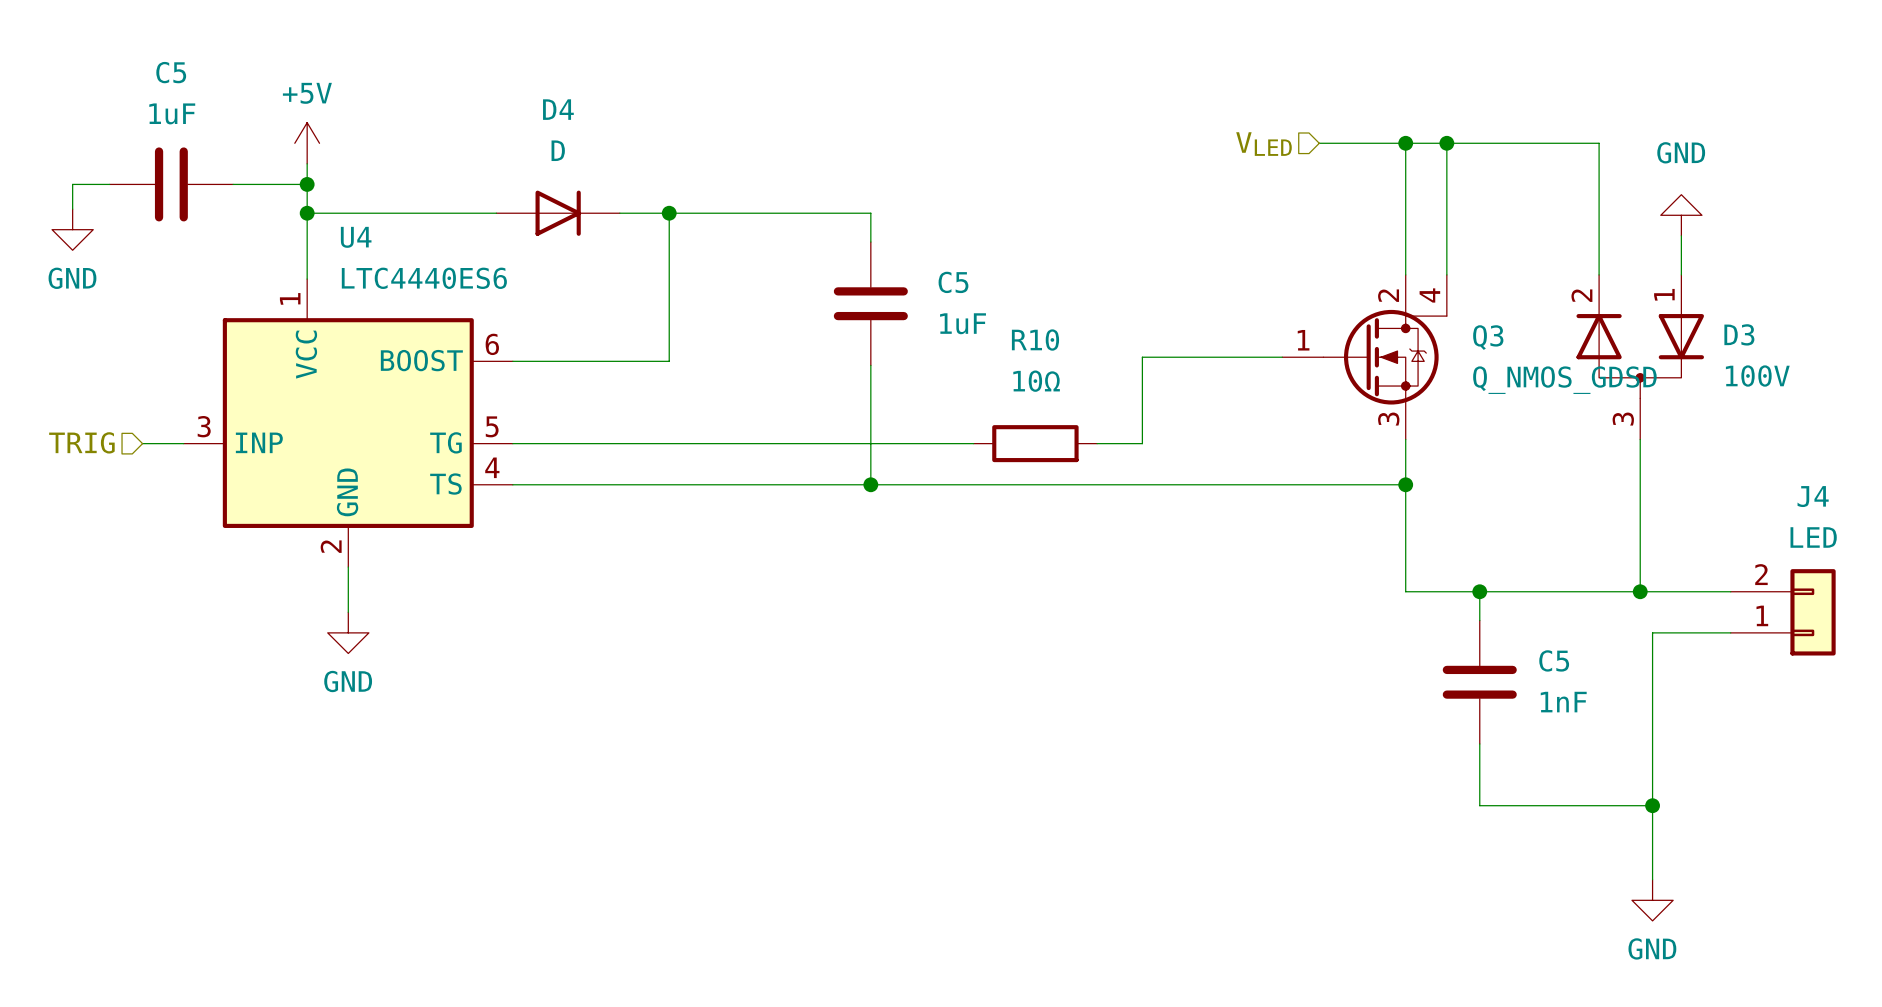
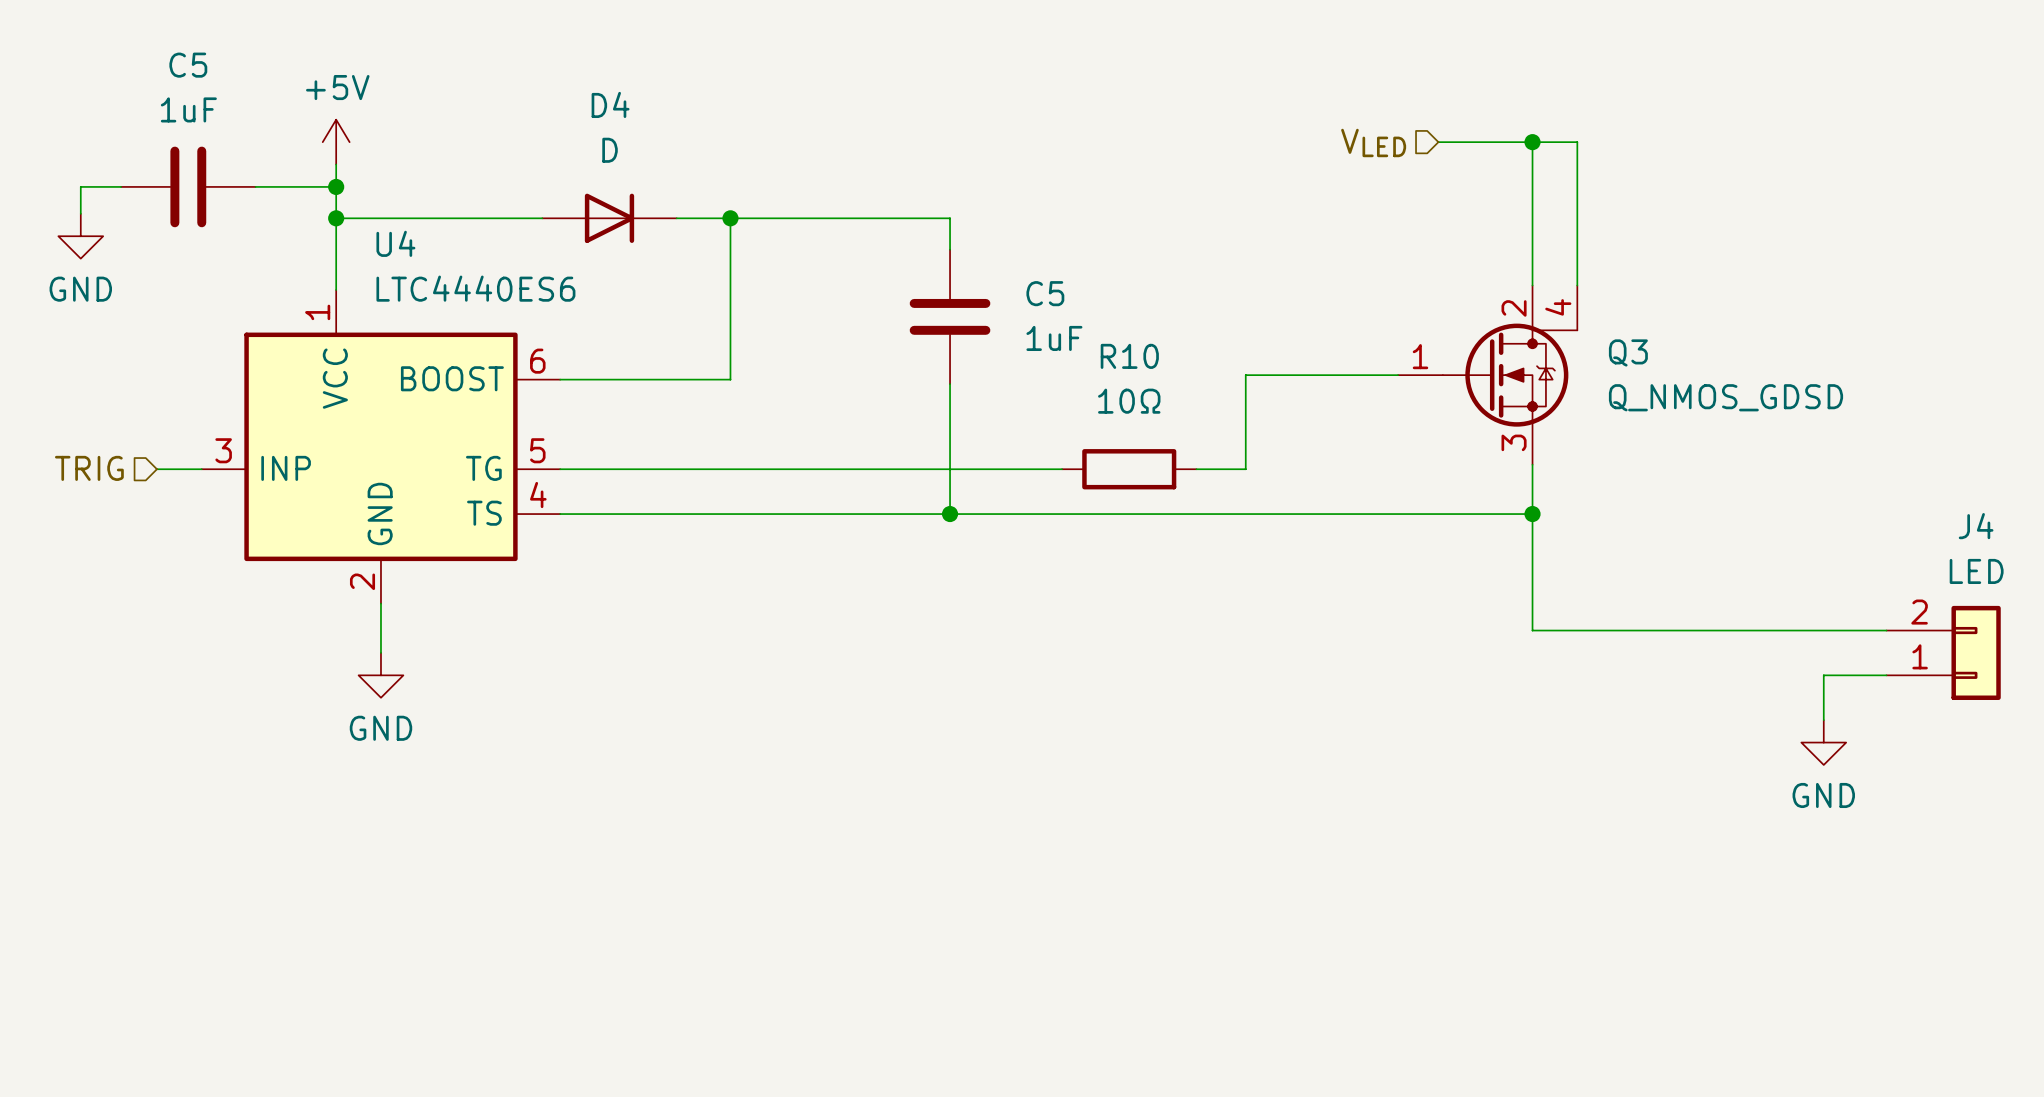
wire: (1446, 143) (1599, 143) (1599, 274) -> none
junction: (1446, 143) -> none
power symbol: GND (1681, 215) -> none
wire: (1681, 235) (1681, 274) -> none
D3: 100V (1640, 357) -> none
wire: (1640, 439) (1640, 591) -> none
wire: (1479, 591) (1479, 620) -> none
junction: (1479, 591) -> none
junction: (1640, 591) -> none
wire: (1673, 632) (1652, 632) (1652, 879) -> (1823, 675) (1823, 720)
C5: 1nF (1479, 682) -> none
wire: (1479, 743) (1479, 805) (1652, 805) -> none
junction: (1652, 805) -> none
power symbol position: GND (1652, 900) -> GND (1823, 742)

